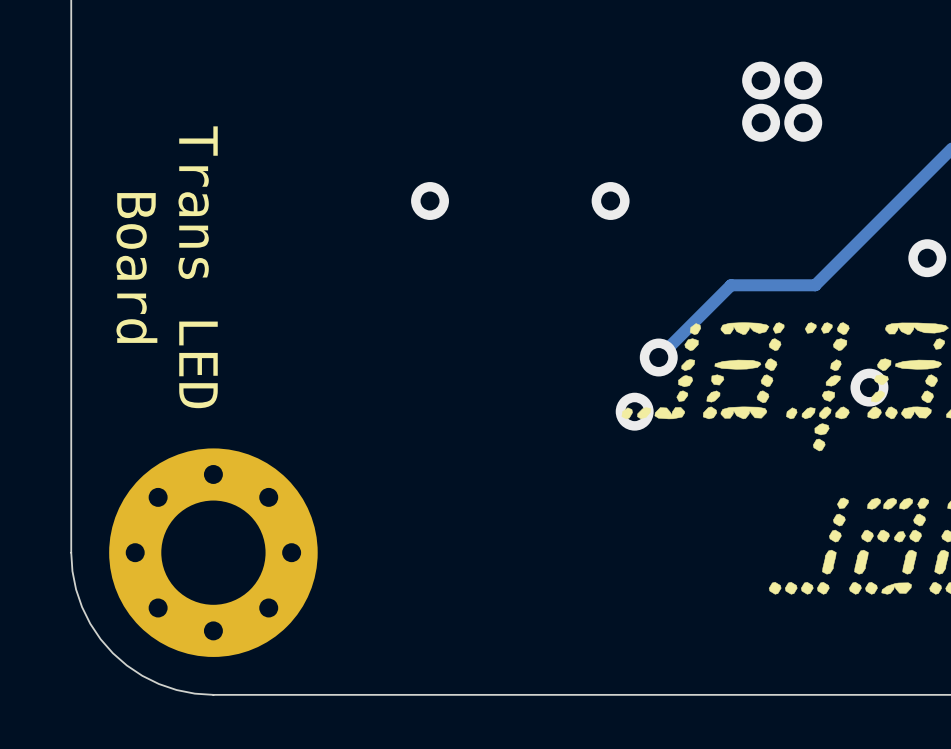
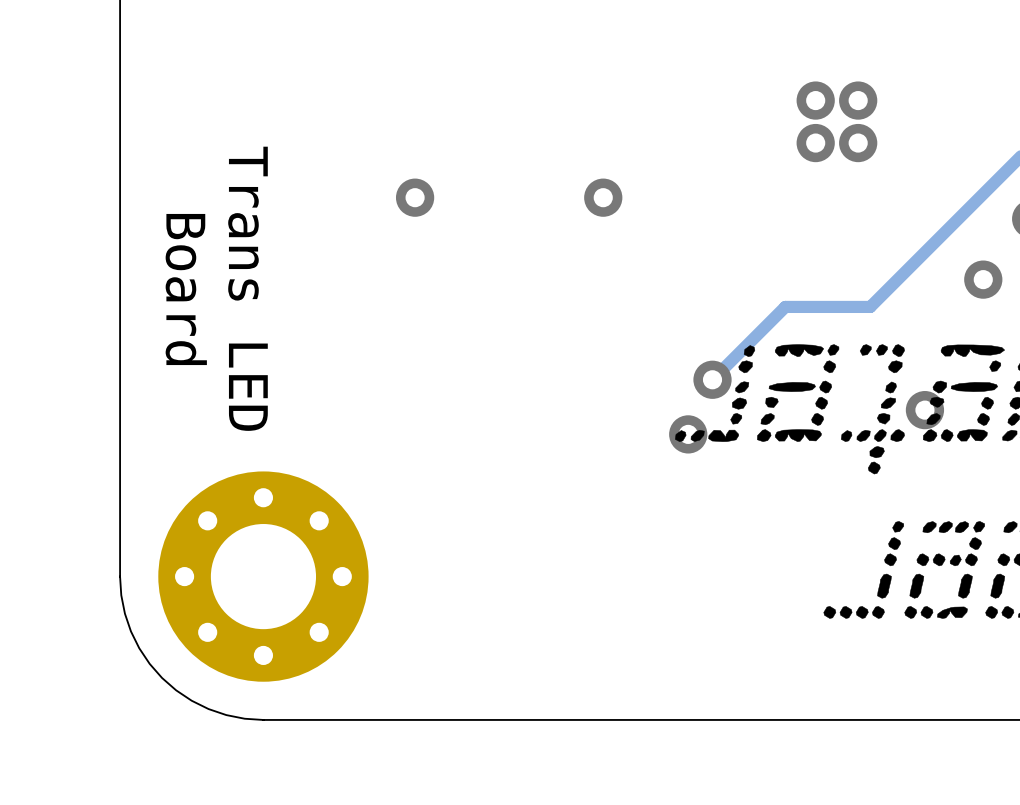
via: none -> (415, 197)
via: none -> (603, 197)
via: (430, 201) -> none
via: (610, 201) -> none

